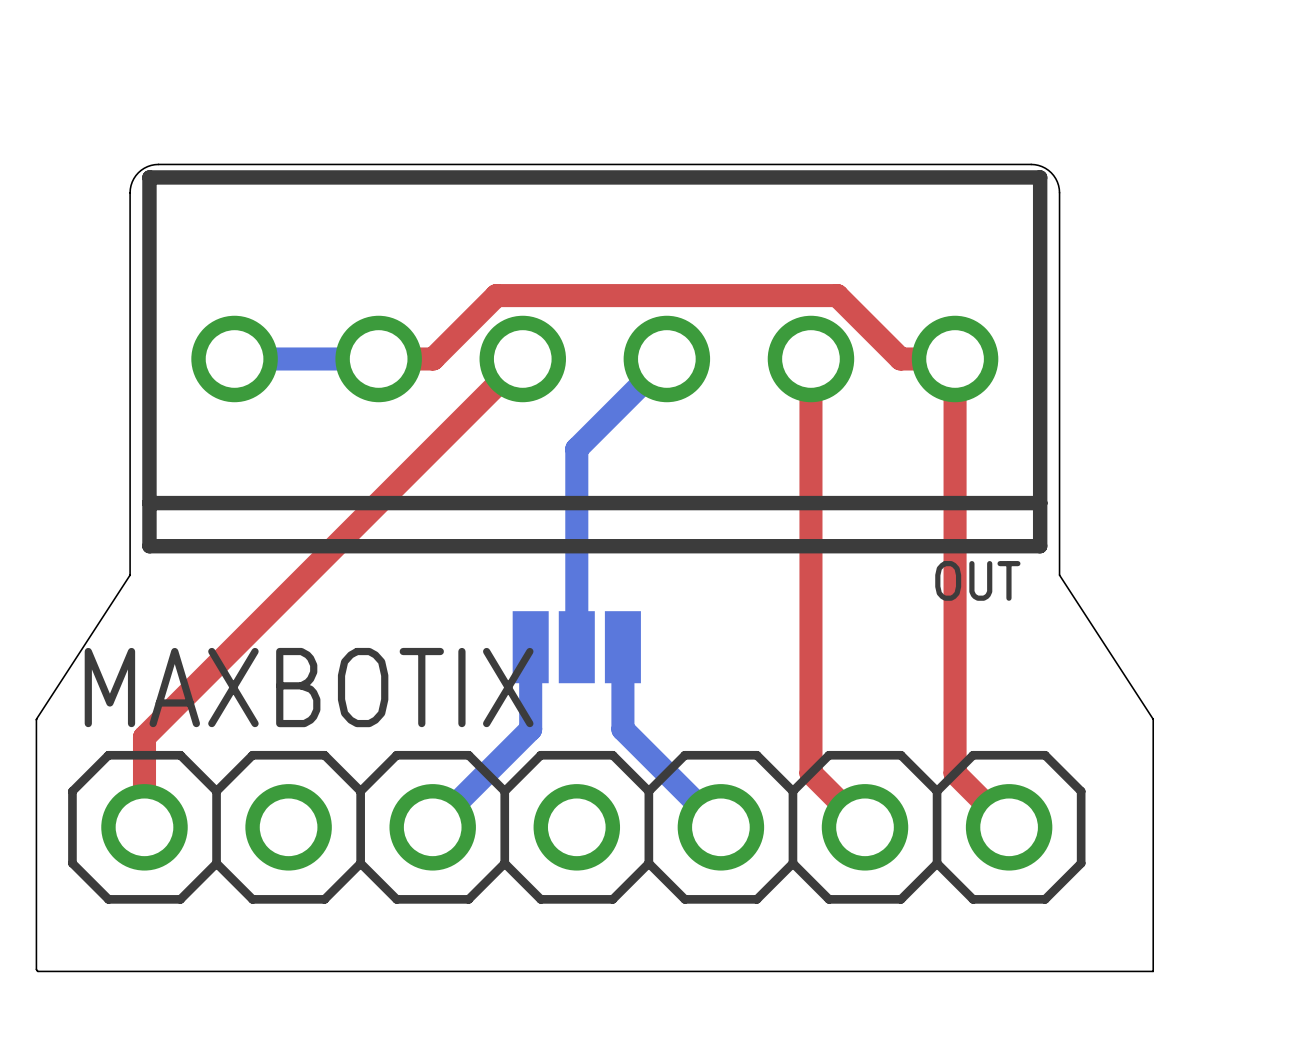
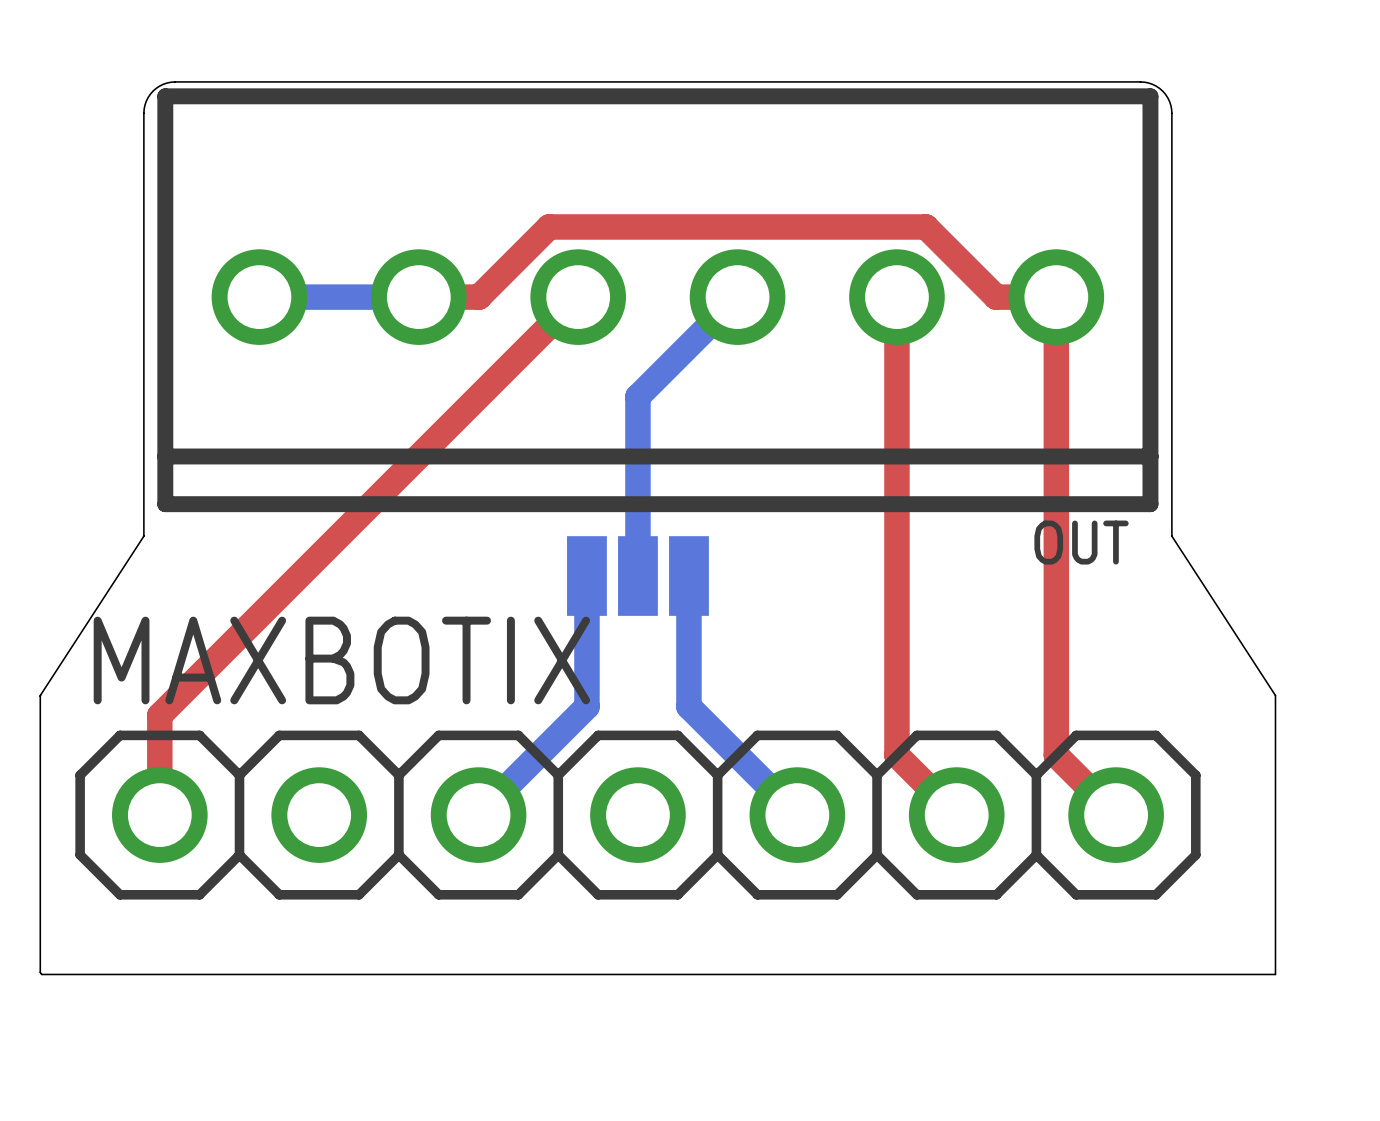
part position: (576, 647) -> (637, 576)

